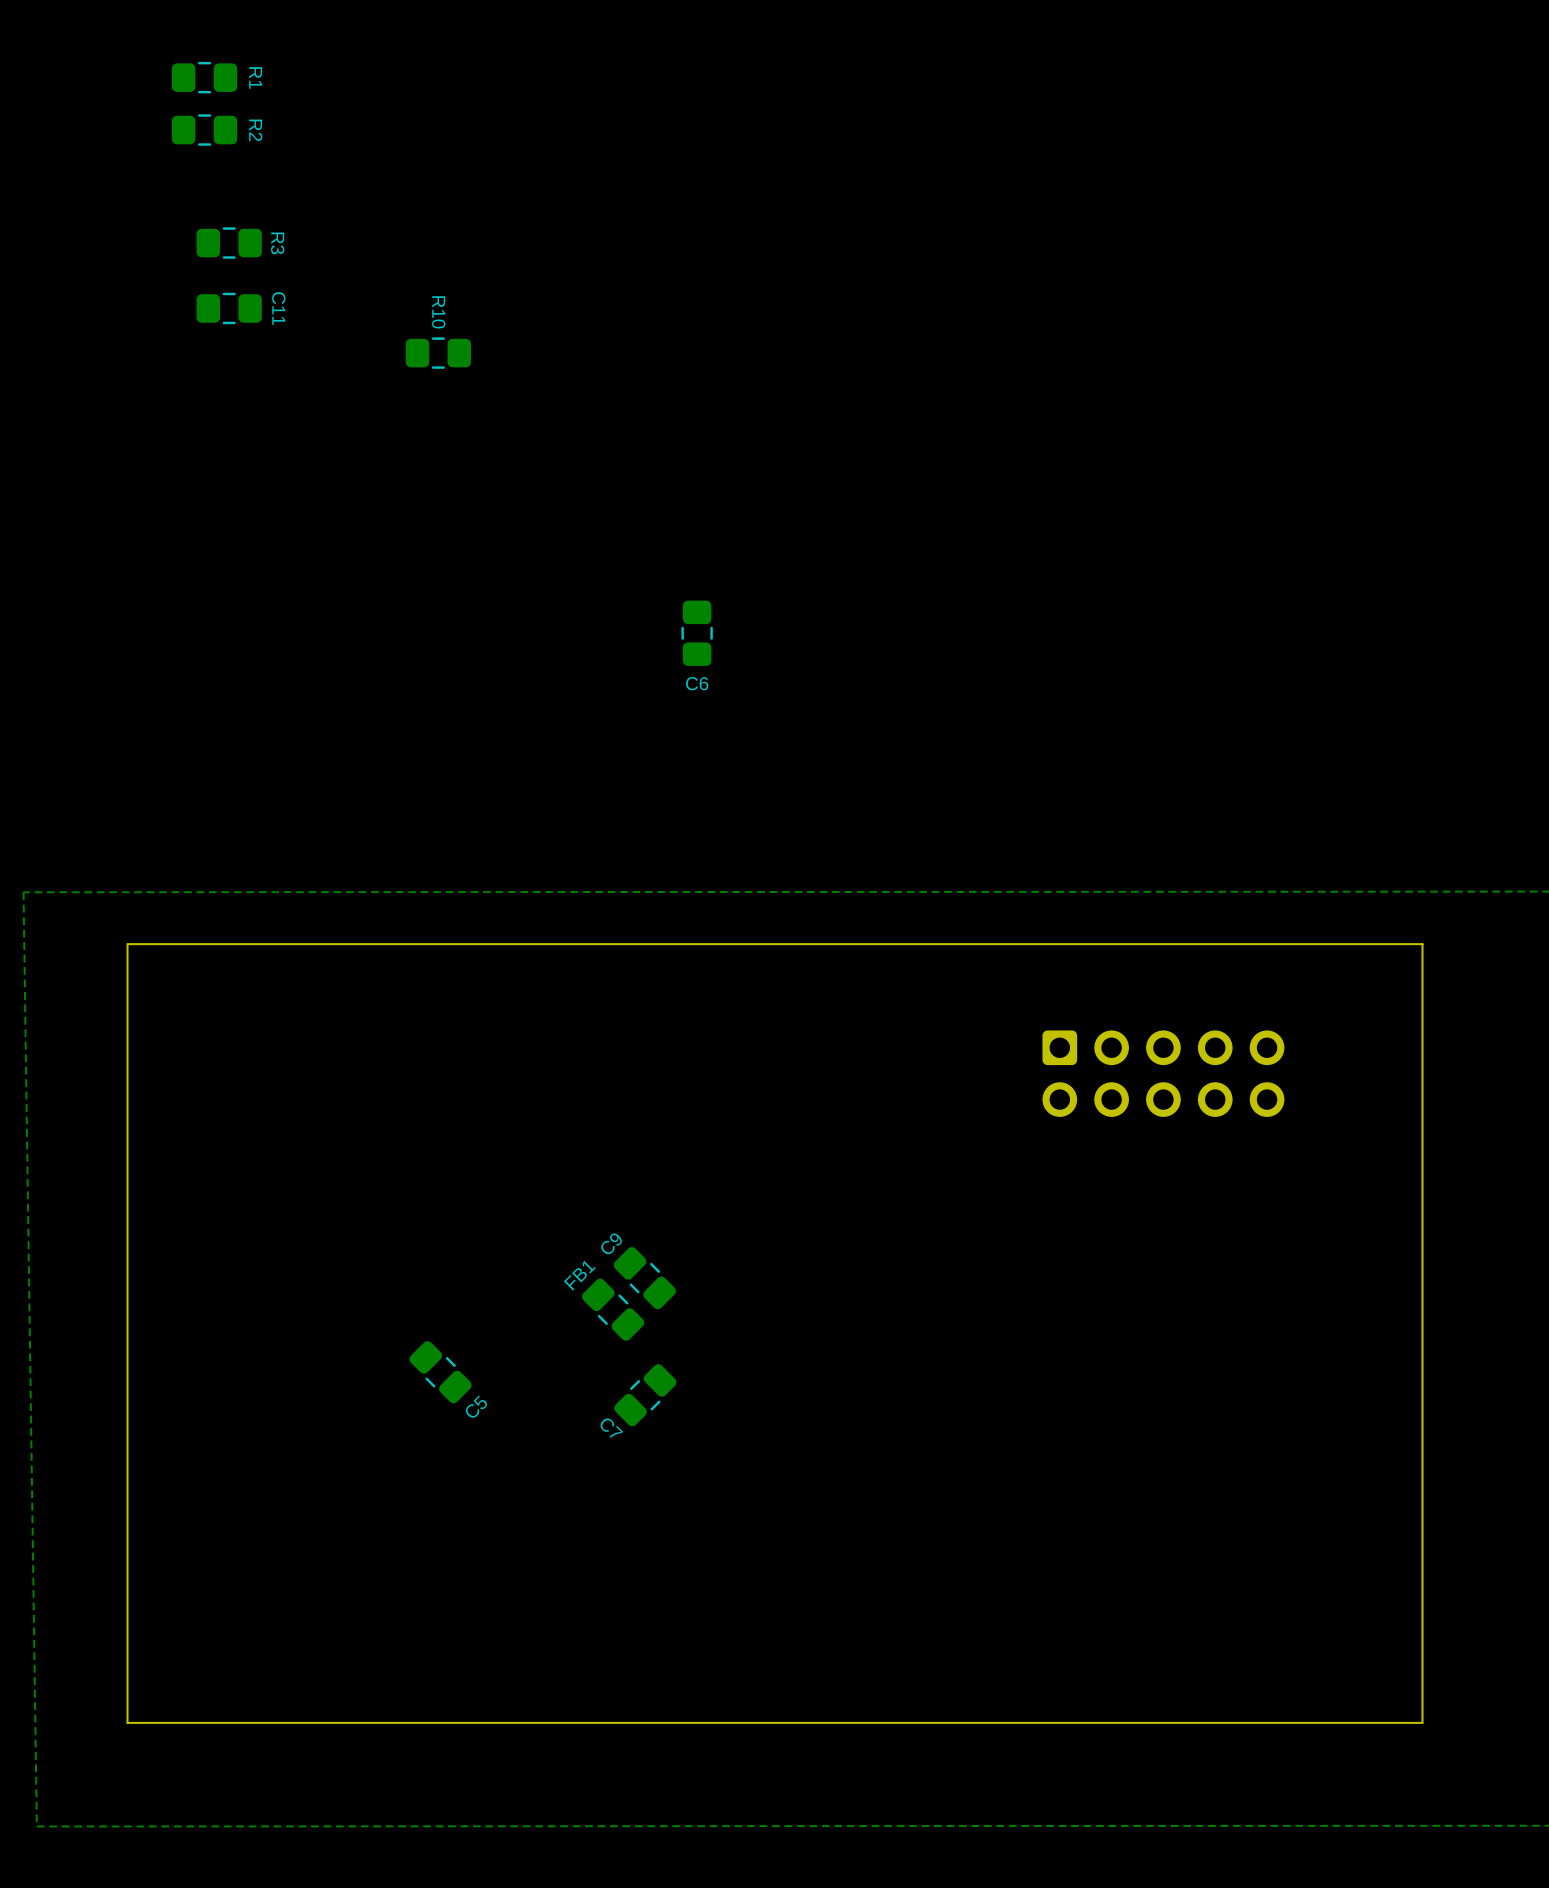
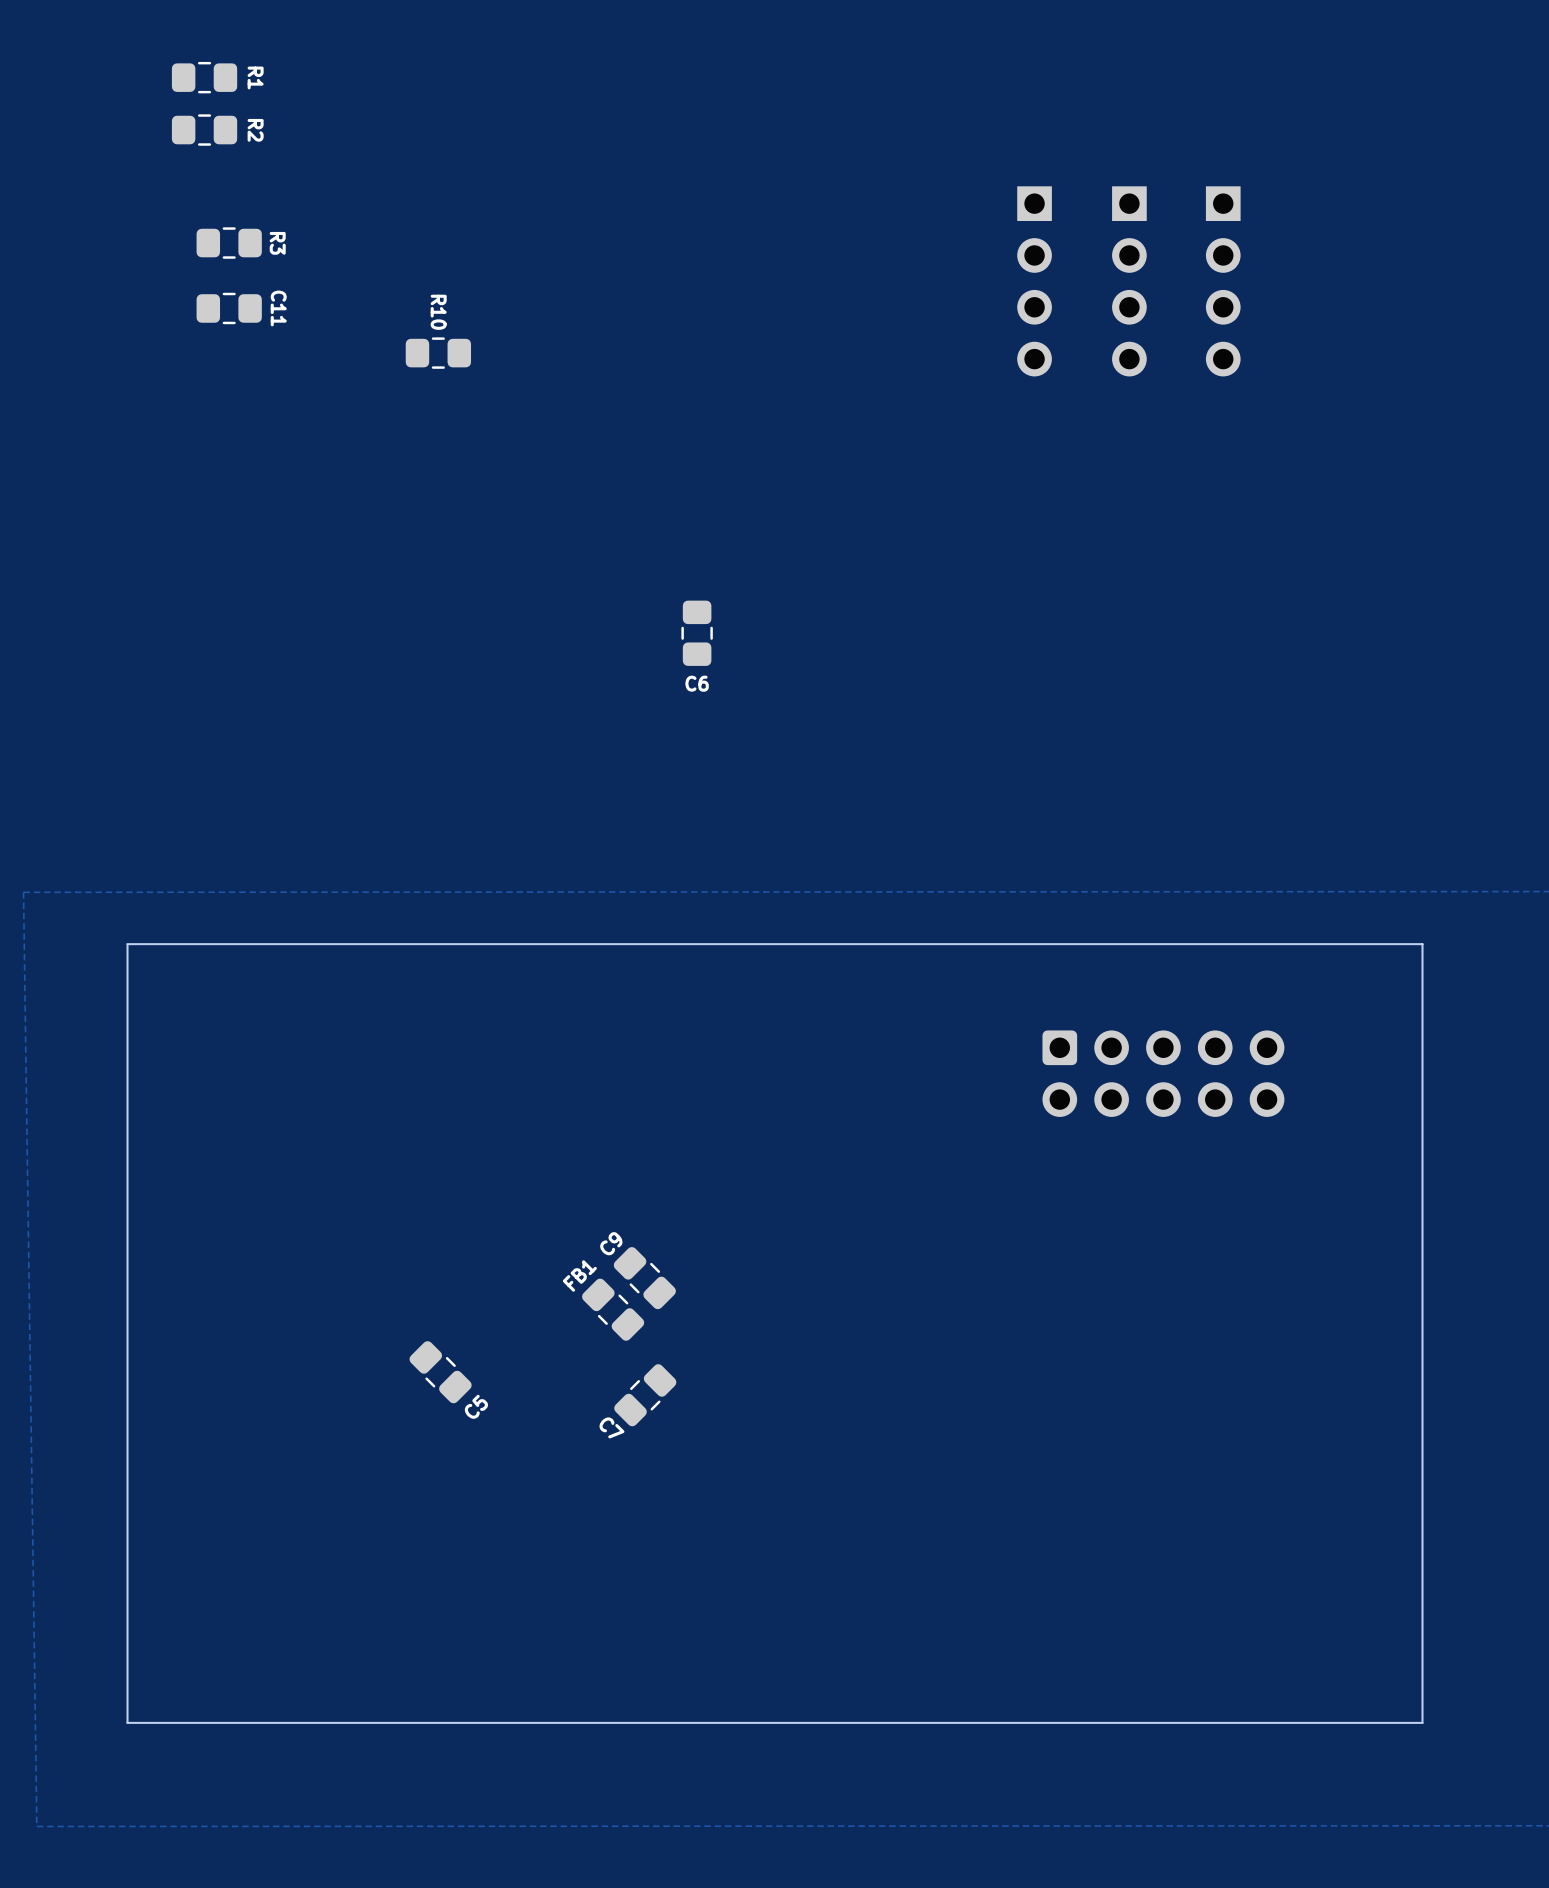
part: none -> (1034, 281)
part: none -> (1129, 281)
part: none -> (1223, 281)

